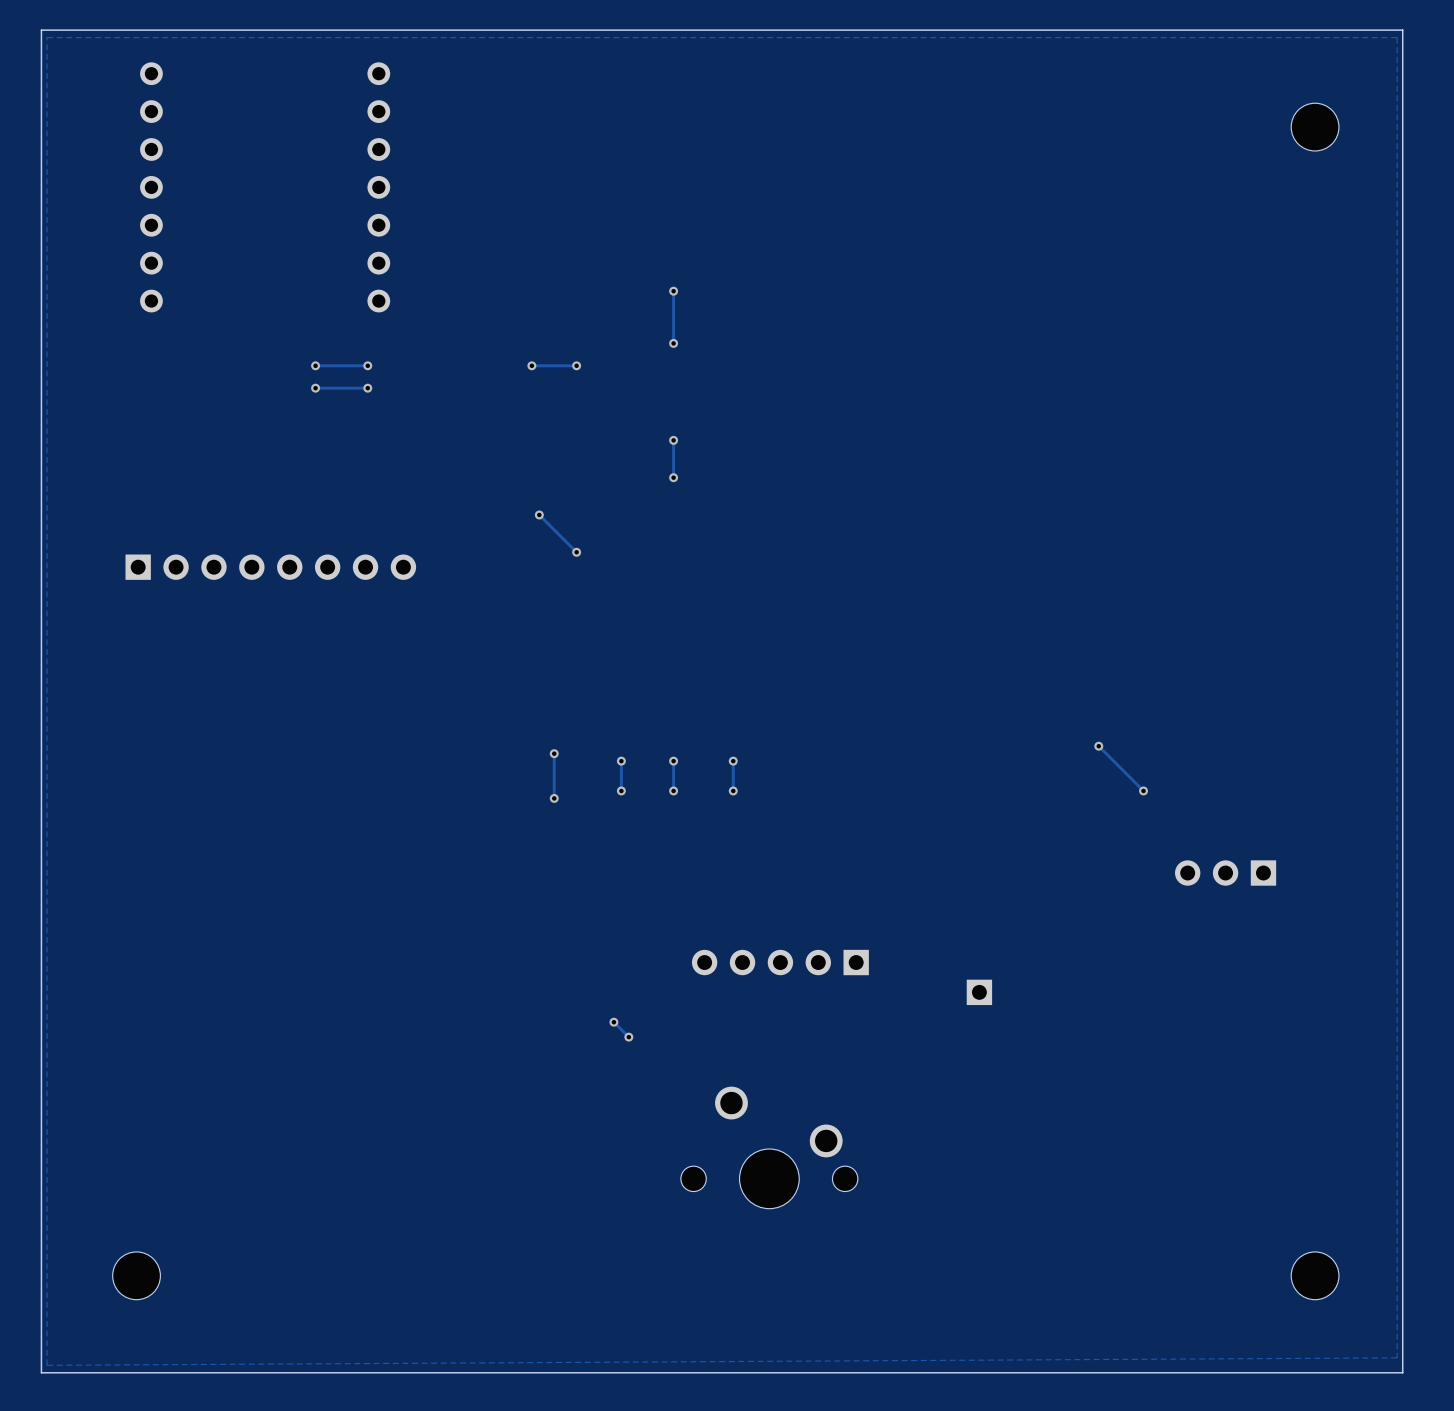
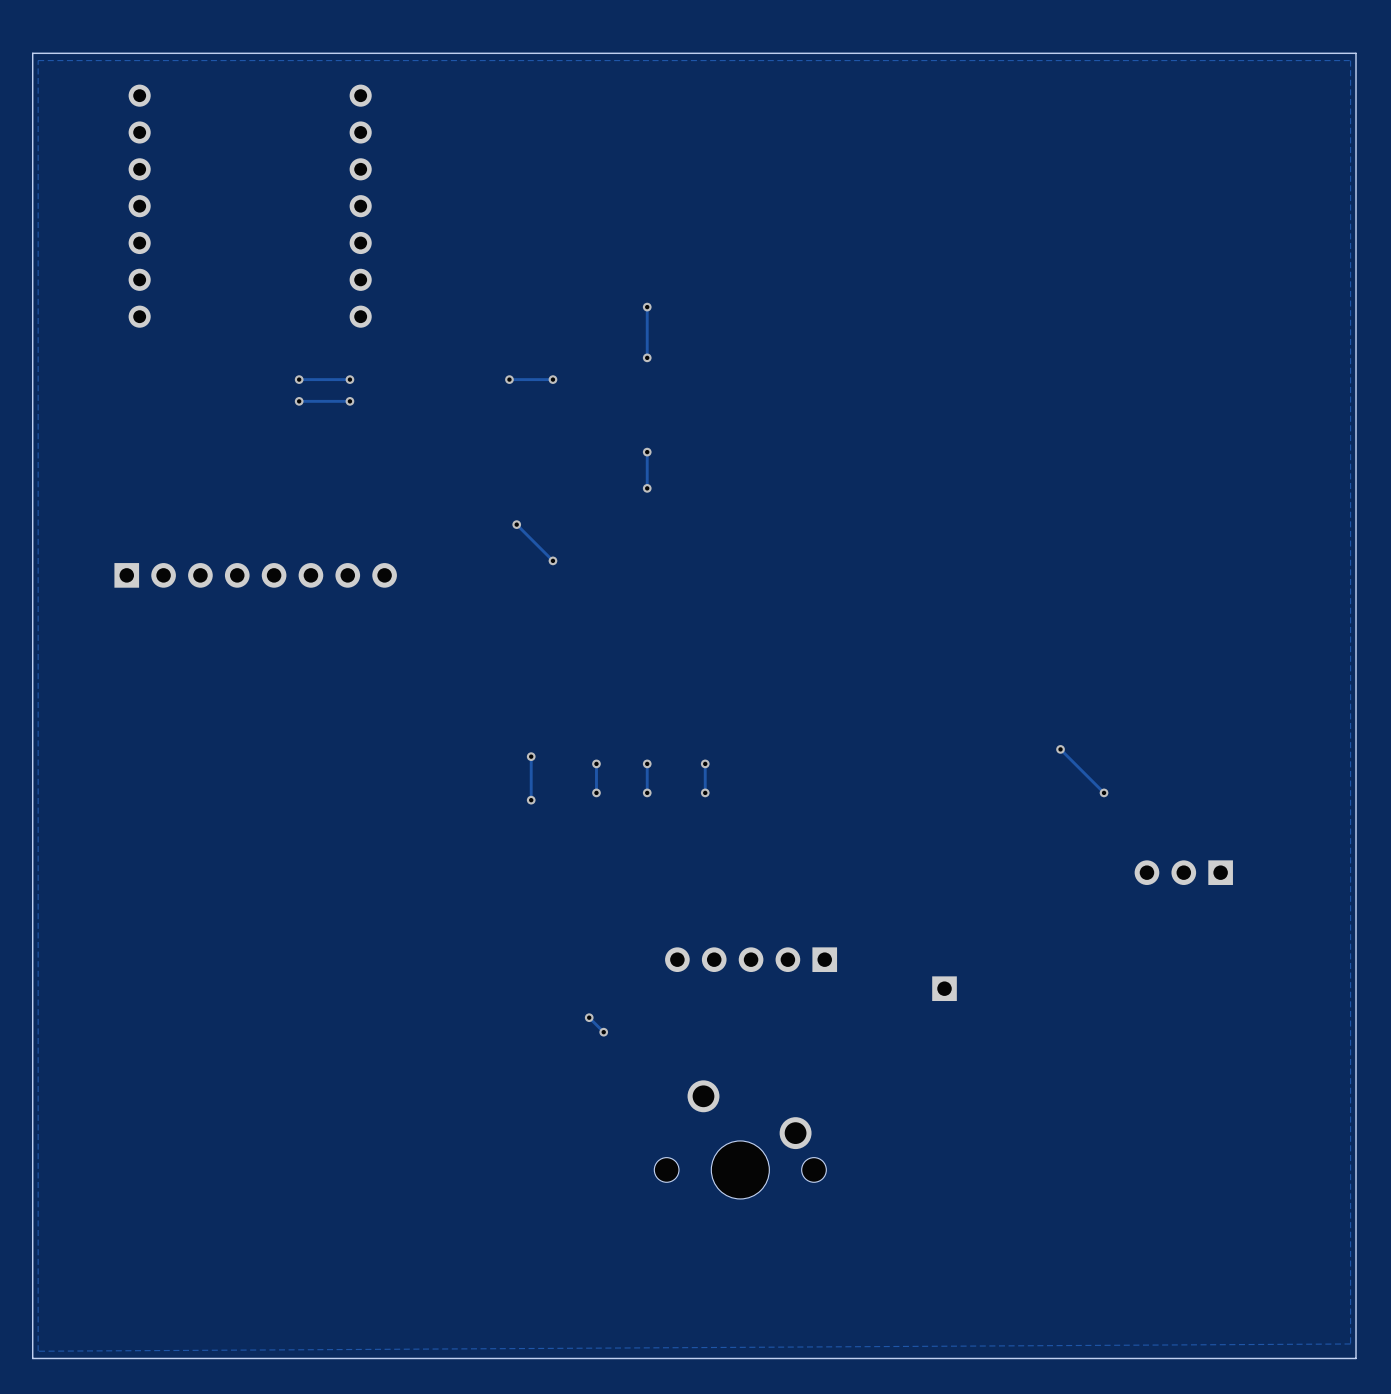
part: (1315, 127) -> none
part: (136, 1275) -> none
part: (1315, 1275) -> none

